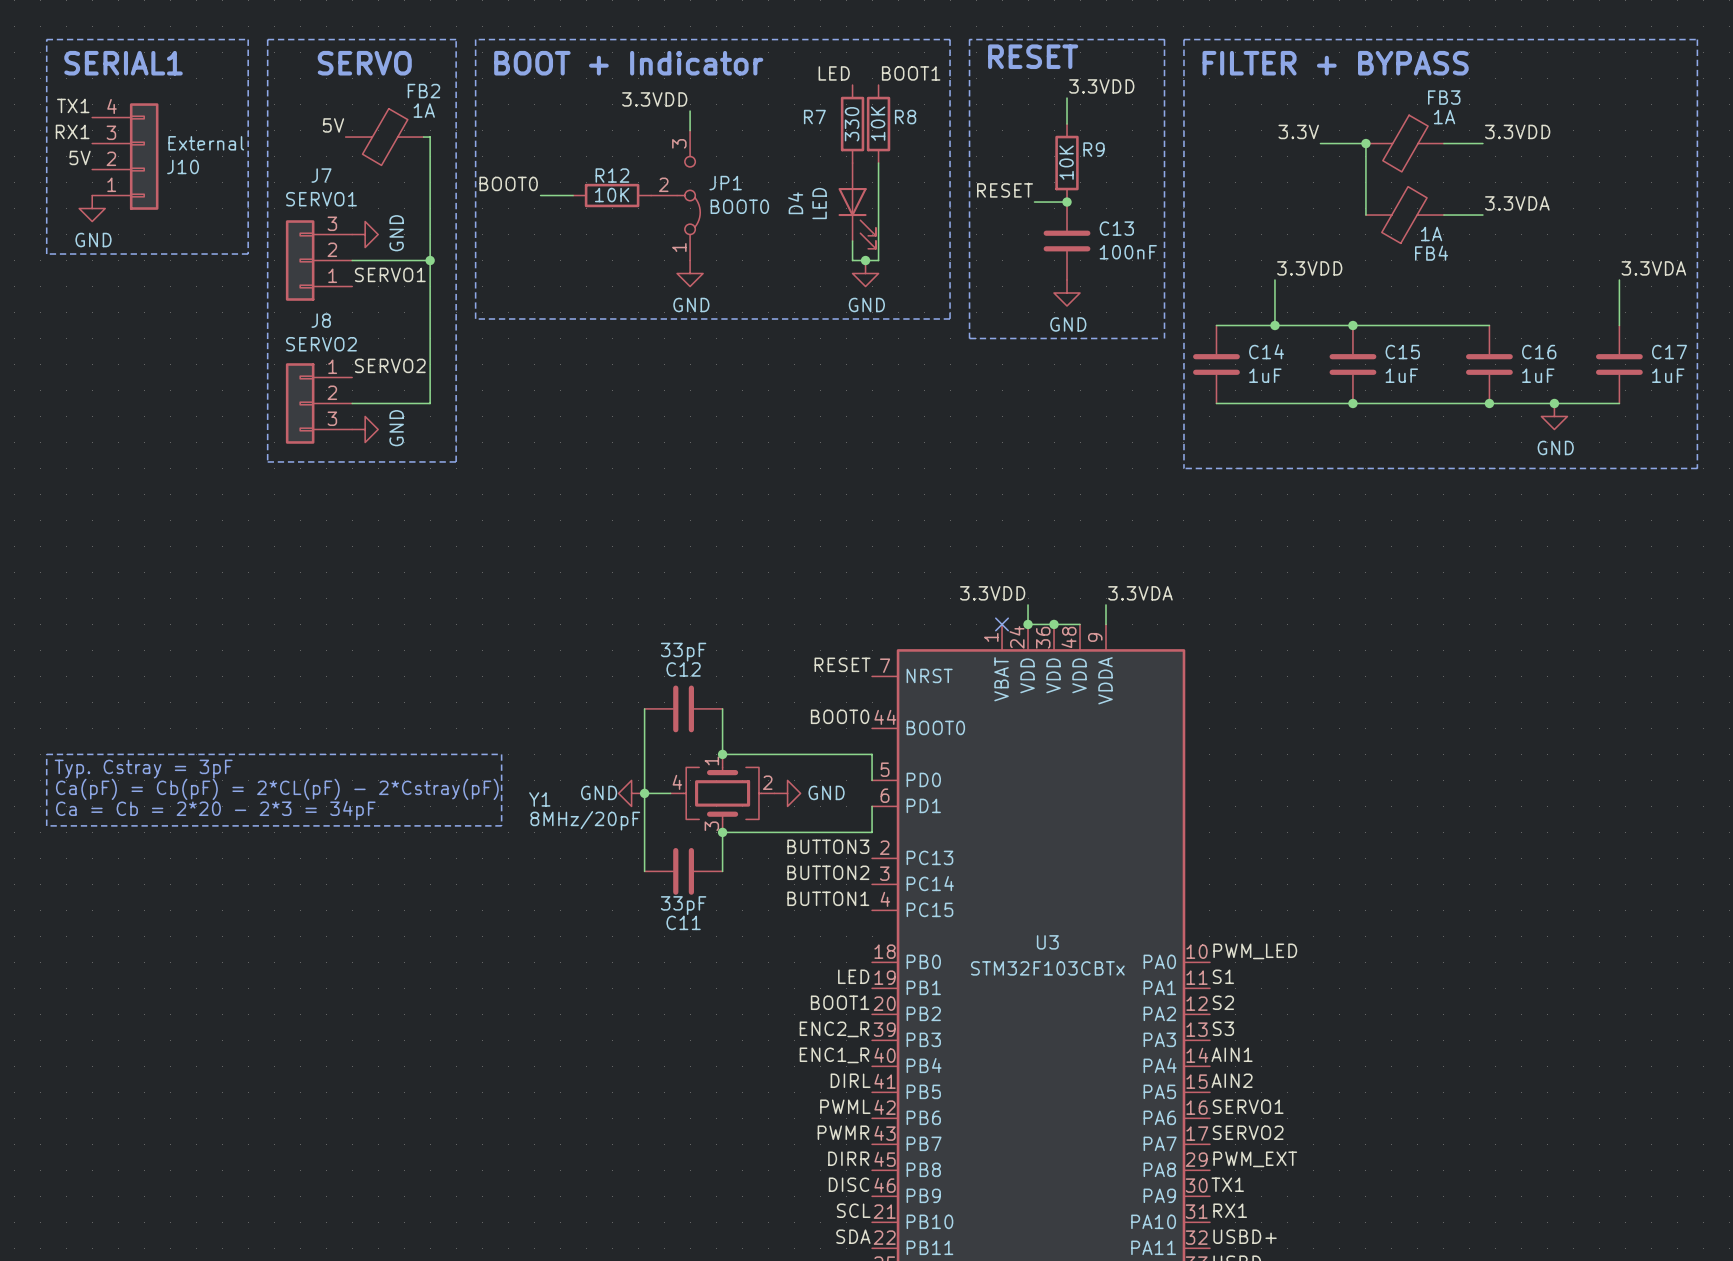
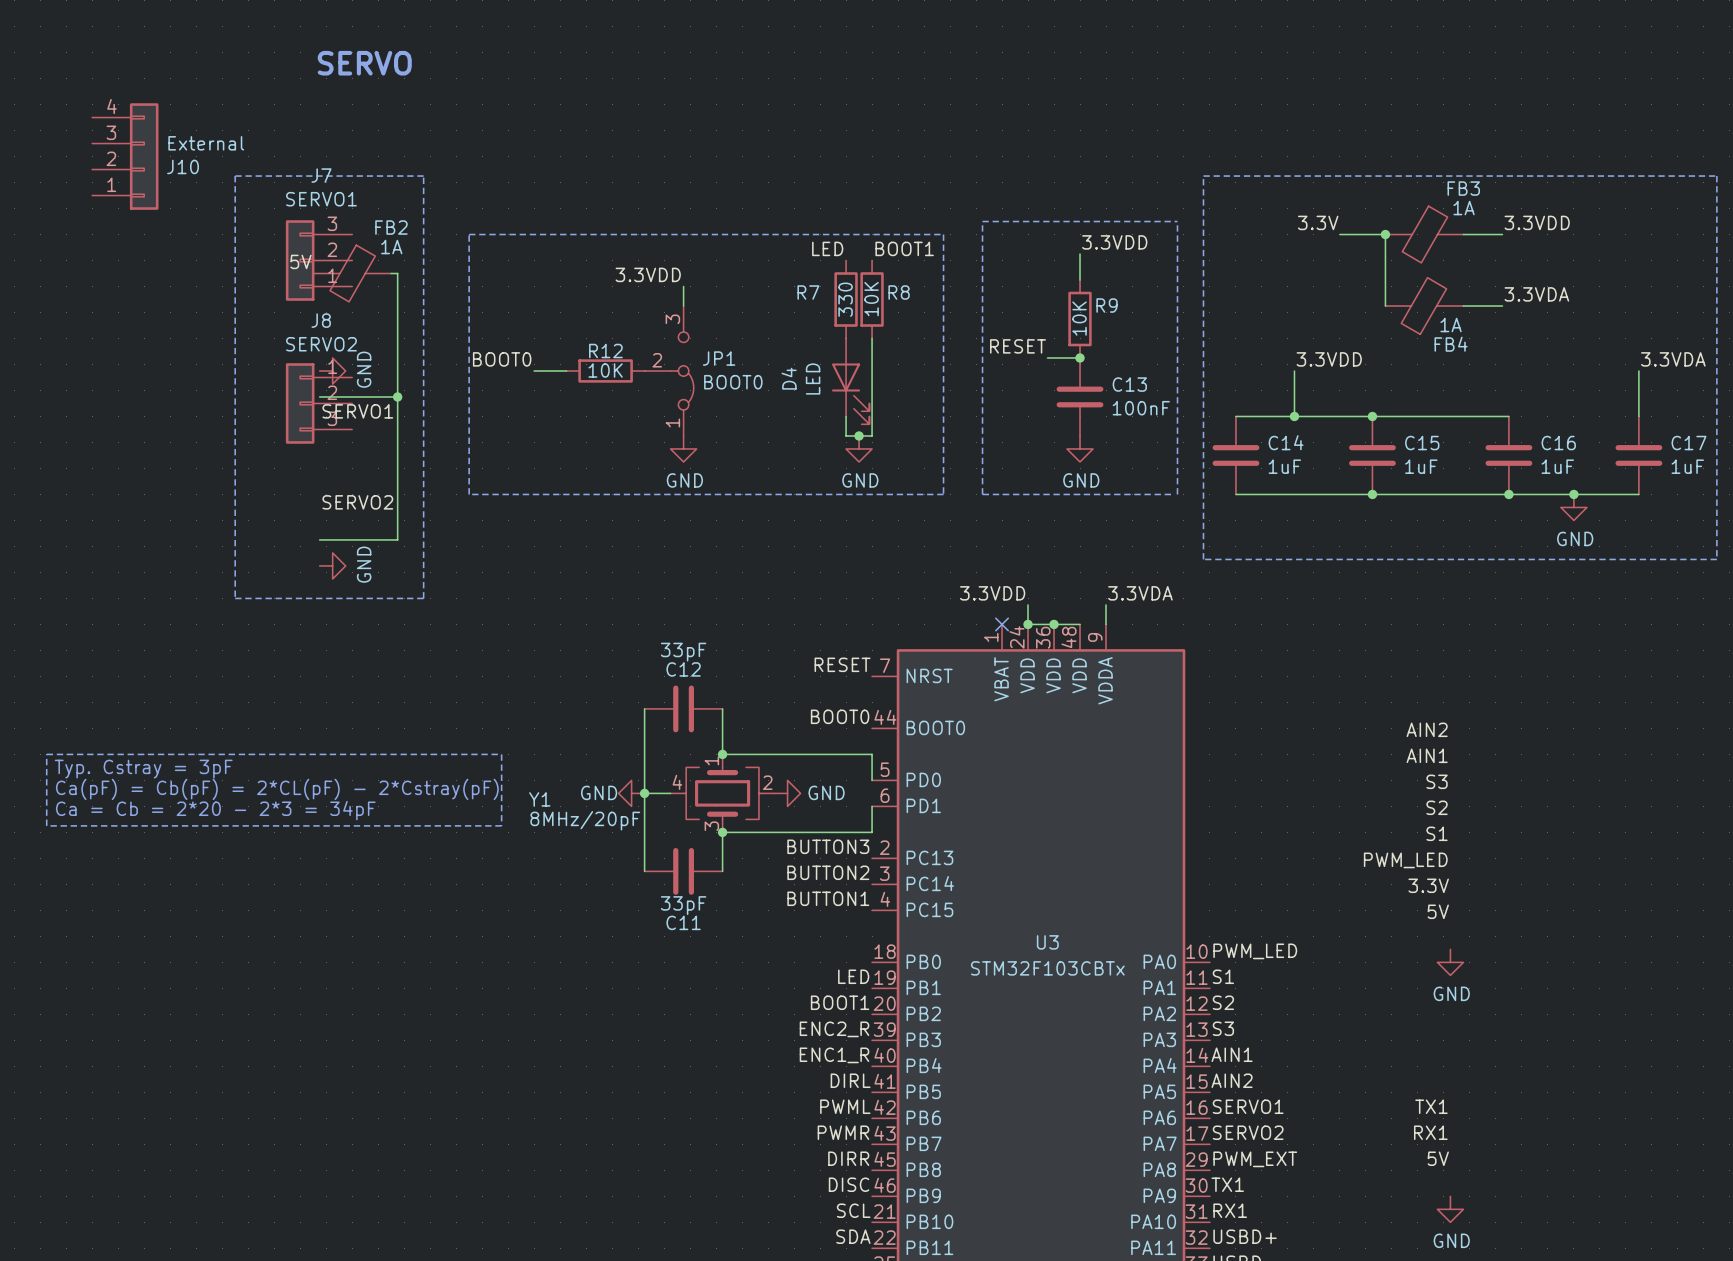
line: (46, 39) (248, 39) (248, 254) (46, 254) (46, 39) -> none
line: (267, 39) (267, 461) (456, 461) (456, 39) (267, 39) -> (235, 176) (235, 598) (423, 598) (423, 176) (235, 176)
line: (475, 39) (950, 39) (950, 319) (475, 319) (475, 39) -> none
line: (1183, 39) (1697, 39) (1697, 468) (1183, 468) (1183, 39) -> (1203, 176) (1203, 559) (1716, 559) (1716, 176) (1203, 176)
text: RESET (1033, 56) -> none
text: SERIAL1 (123, 63) -> none
text: BOOT + Indicator (628, 63) -> none
text: FILTER + BYPASS (1335, 63) -> none
label position: LED (834, 73) -> LED (827, 248)
label position: BOOT1 (911, 73) -> BOOT1 (904, 248)
label: 3.3VDD (1101, 86) -> none
wire: (1067, 98) (1067, 124) -> (1080, 254) (1080, 280)
label position: 3.3VDD (654, 99) -> 3.3VDD (648, 274)
label: TX1 (73, 105) -> none
wire: (690, 111) (690, 130) -> (683, 286) (683, 306)
R7 position: (852, 124) -> (846, 299)
R8 position: (878, 124) -> (872, 299)
label: 5V (333, 125) -> none
label: RX1 (72, 131) -> none
label position: 3.3V (1298, 131) -> 3.3V (1318, 222)
label position: 3.3VDD (1517, 131) -> 3.3VDD (1537, 222)
FB2 position: (384, 137) -> (352, 273)
wire: (423, 137) (430, 137) (430, 403) (352, 403) -> (391, 273) (397, 273) (397, 539) (319, 539)
wire: (1320, 143) (1365, 143) (1365, 215) -> (1339, 234) (1385, 234) (1385, 306)
junction: (1365, 143) -> none
FB3 position: (1404, 143) -> (1424, 234)
wire: (1443, 143) (1482, 143) -> (1463, 234) (1502, 234)
label: 5V (80, 157) -> none
wire: (878, 163) (878, 260) (852, 260) (852, 241) -> (872, 338) (872, 435) (846, 435) (846, 416)
R9 position: (1067, 163) -> (1080, 319)
label position: BOOT0 (508, 183) -> BOOT0 (502, 359)
label position: RESET (1005, 190) -> RESET (1018, 346)
wire: (540, 195) (573, 195) -> (534, 370) (566, 370)
R12 position: (612, 195) -> (605, 370)
JP1 position: (675, 195) -> (669, 370)
wire: (1034, 202) (1067, 202) -> (1047, 357) (1080, 357)
junction: (1067, 202) -> none
label: 3.3VDA (1517, 203) -> none
D4 position: (857, 205) -> (850, 381)
power symbol: GND (92, 208) -> none
FB4 position: (1404, 215) -> (1424, 306)
wire: (1443, 215) (1482, 215) -> (1463, 306) (1502, 306)
power symbol: GND (365, 234) -> none
line: none -> (469, 234) (469, 494) (943, 494) (943, 234) (469, 234)
junction: none -> (1385, 234)
C13 position: (1067, 241) -> (1080, 396)
label: none -> 3.3VDD (1114, 242)
wire: (352, 260) (430, 260) -> (319, 396) (397, 396)
junction: (430, 260) -> none
junction: (865, 260) -> none
label: none -> 5V (300, 261)
label position: 3.3VDD (1309, 268) -> 3.3VDD (1329, 359)
label: 3.3VDA (1653, 268) -> none
power symbol: GND (690, 273) -> none
power symbol: GND (865, 273) -> none
label position: SERVO1 (390, 274) -> SERVO1 (357, 411)
wire: (1274, 280) (1274, 325) -> (1294, 370) (1294, 416)
wire: (1619, 280) (1619, 325) -> (1638, 370) (1638, 416)
power symbol: GND (1067, 293) -> none
label: none -> 3.3VDA (1536, 294)
wire: (1216, 325) (1489, 325) -> (1235, 416) (1508, 416)
junction: (1274, 325) -> none
junction: (1352, 325) -> none
line: (1157, 338) (969, 338) (969, 39) (1164, 39) (1164, 338) -> none
junction: none -> (1080, 357)
label: none -> 3.3VDA (1673, 359)
C14 position: (1216, 364) -> (1235, 455)
C15 position: (1352, 364) -> (1372, 455)
C16 position: (1489, 364) -> (1508, 455)
C17 position: (1619, 364) -> (1638, 455)
label position: SERVO2 (390, 365) -> SERVO2 (357, 502)
junction: none -> (397, 396)
wire: (1216, 403) (1619, 403) -> (1235, 494) (1638, 494)
junction position: (1352, 403) -> (1372, 416)
junction: (1489, 403) -> none
junction: (1554, 403) -> none
junction: none -> (1294, 416)
power symbol position: GND (1554, 416) -> GND (1573, 507)
power symbol position: GND (365, 429) -> GND (332, 370)
junction: none -> (859, 435)
power symbol: none -> GND (683, 448)
power symbol: none -> GND (859, 448)
power symbol: none -> GND (1080, 448)
line: none -> (1170, 494) (982, 494) (982, 221) (1177, 221) (1177, 494)
junction: none -> (1372, 494)
junction: none -> (1508, 494)
junction: none -> (1573, 494)
power symbol: none -> GND (332, 565)
label: none -> AIN2 (1427, 729)
label: none -> AIN1 (1427, 755)
label: none -> S3 (1437, 781)
label: none -> S2 (1437, 807)
label: none -> S1 (1437, 833)
label: none -> PWM_LED (1405, 860)
label: none -> 3.3V (1428, 885)
label: none -> 5V (1438, 911)
power symbol: none -> GND (1450, 962)
label: none -> TX1 (1431, 1106)
label: none -> RX1 (1430, 1132)
label: none -> 5V (1438, 1158)
power symbol: none -> GND (1450, 1209)

